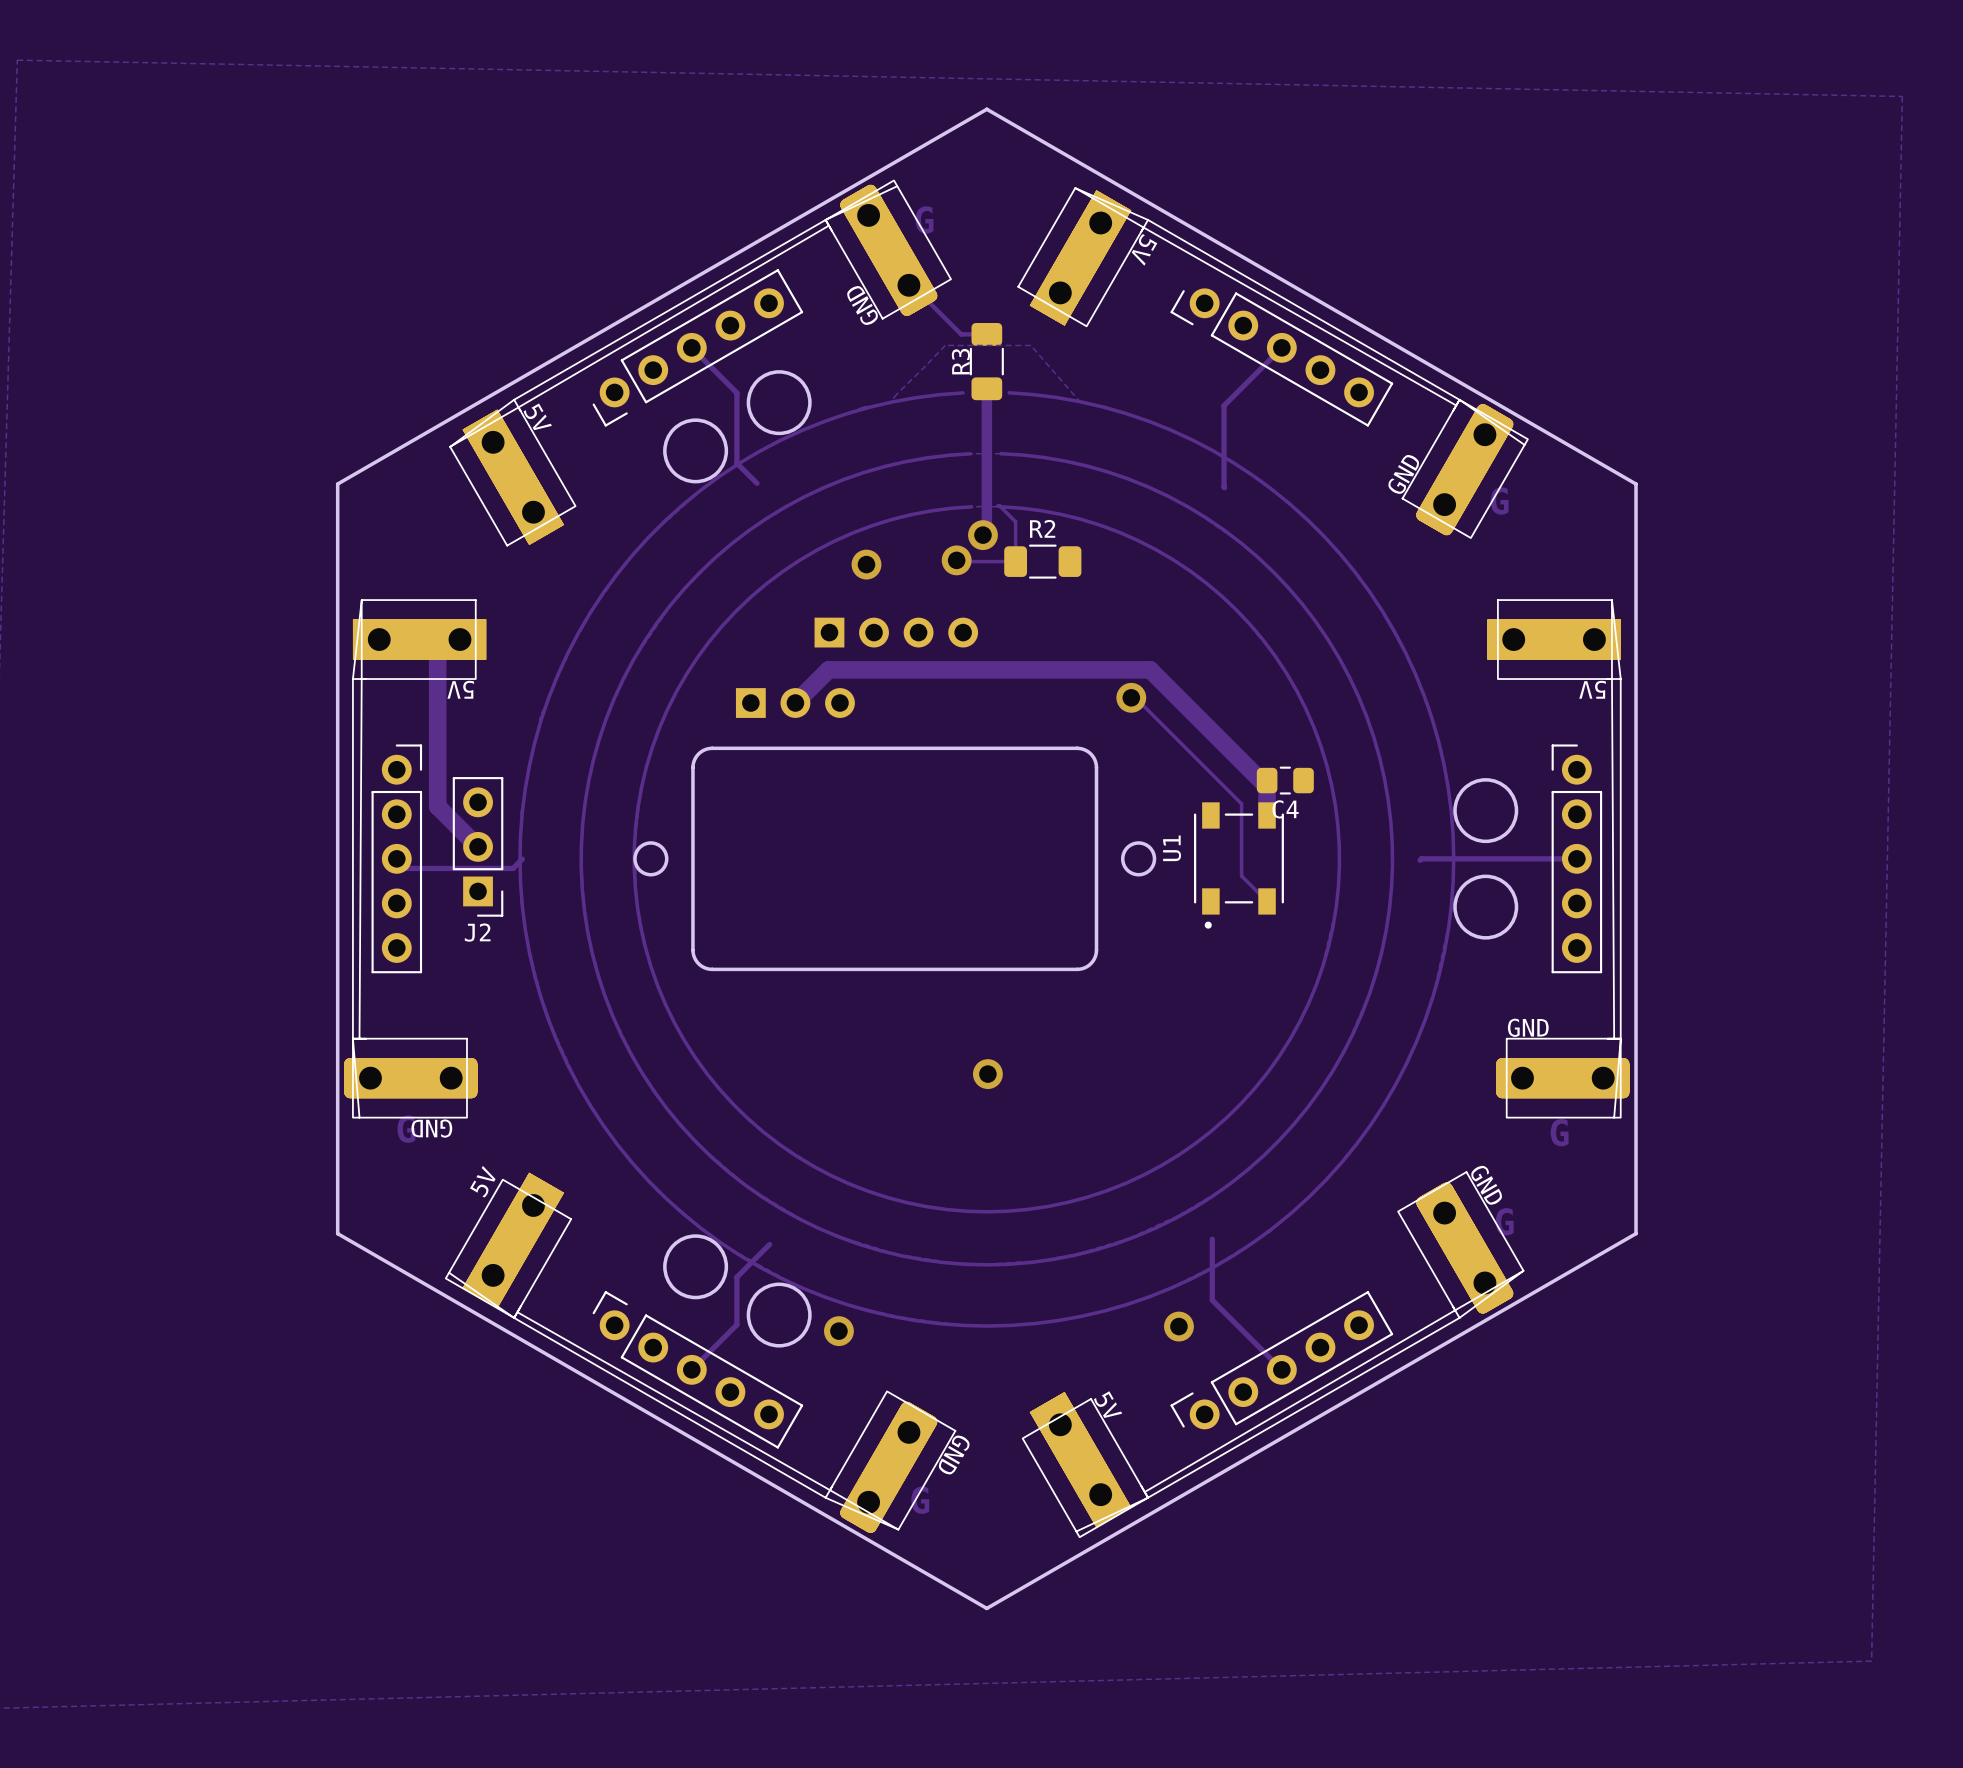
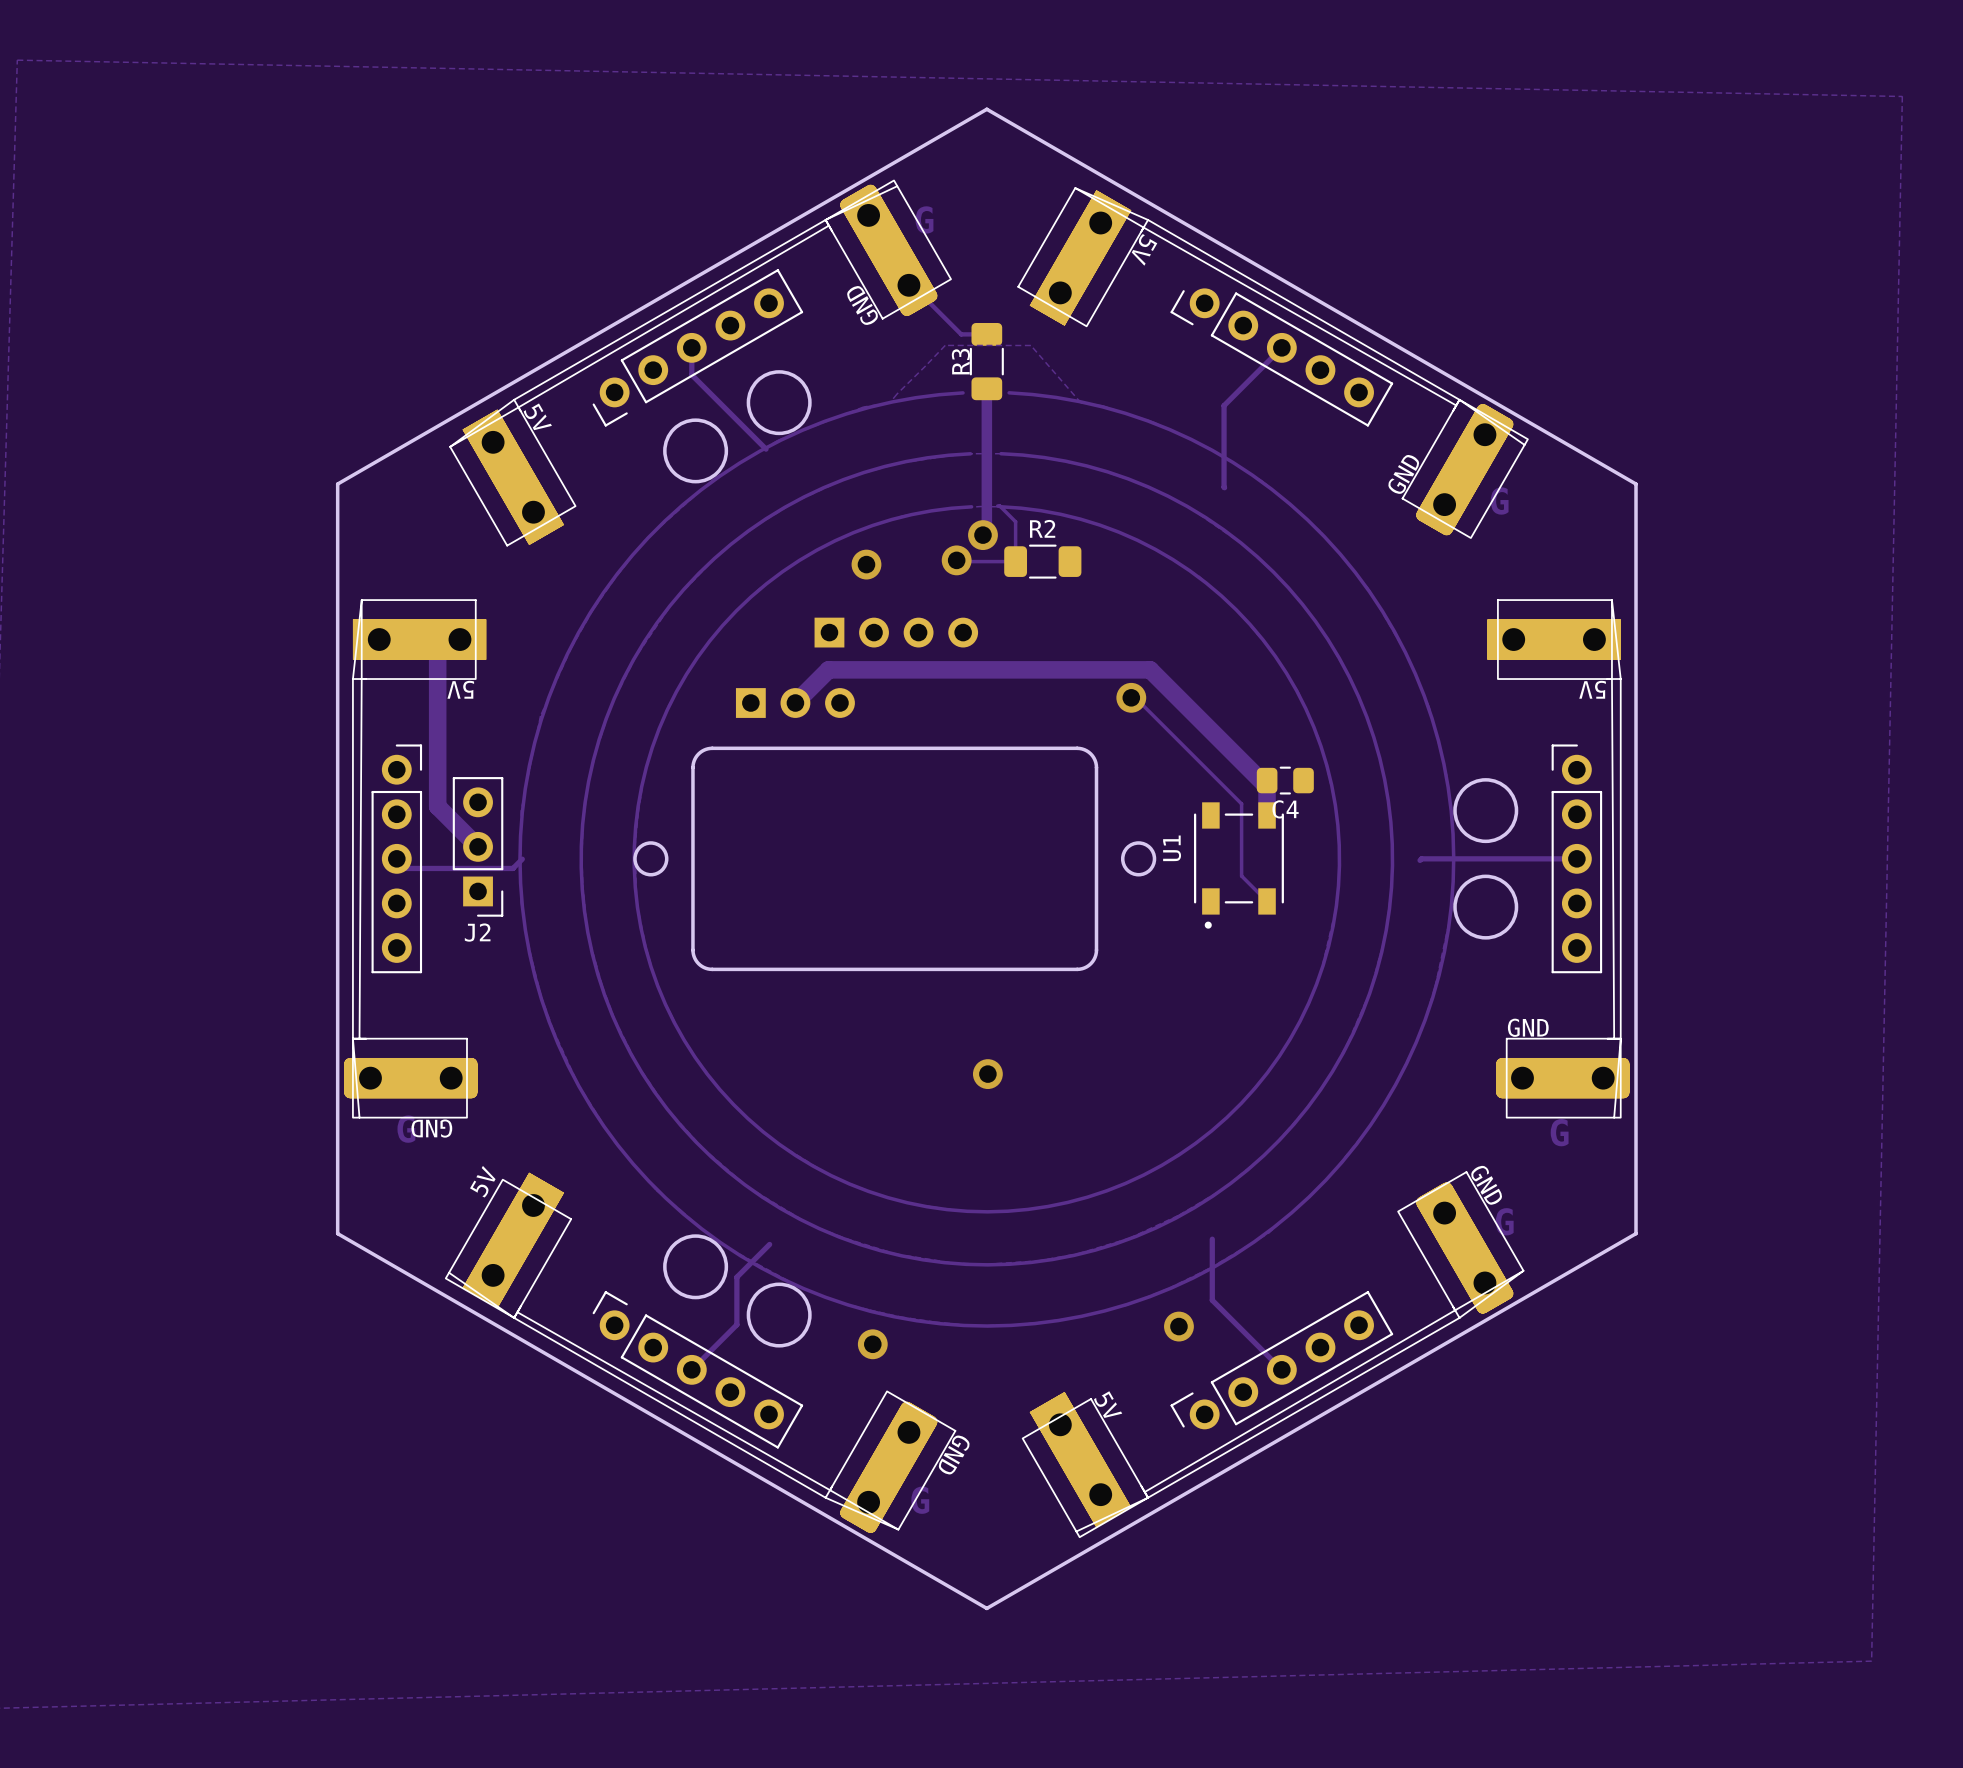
track: (691, 347) (736, 392) (736, 463) (757, 483) -> (691, 347) (691, 374) (766, 449)
via position: (838, 1331) -> (872, 1344)

